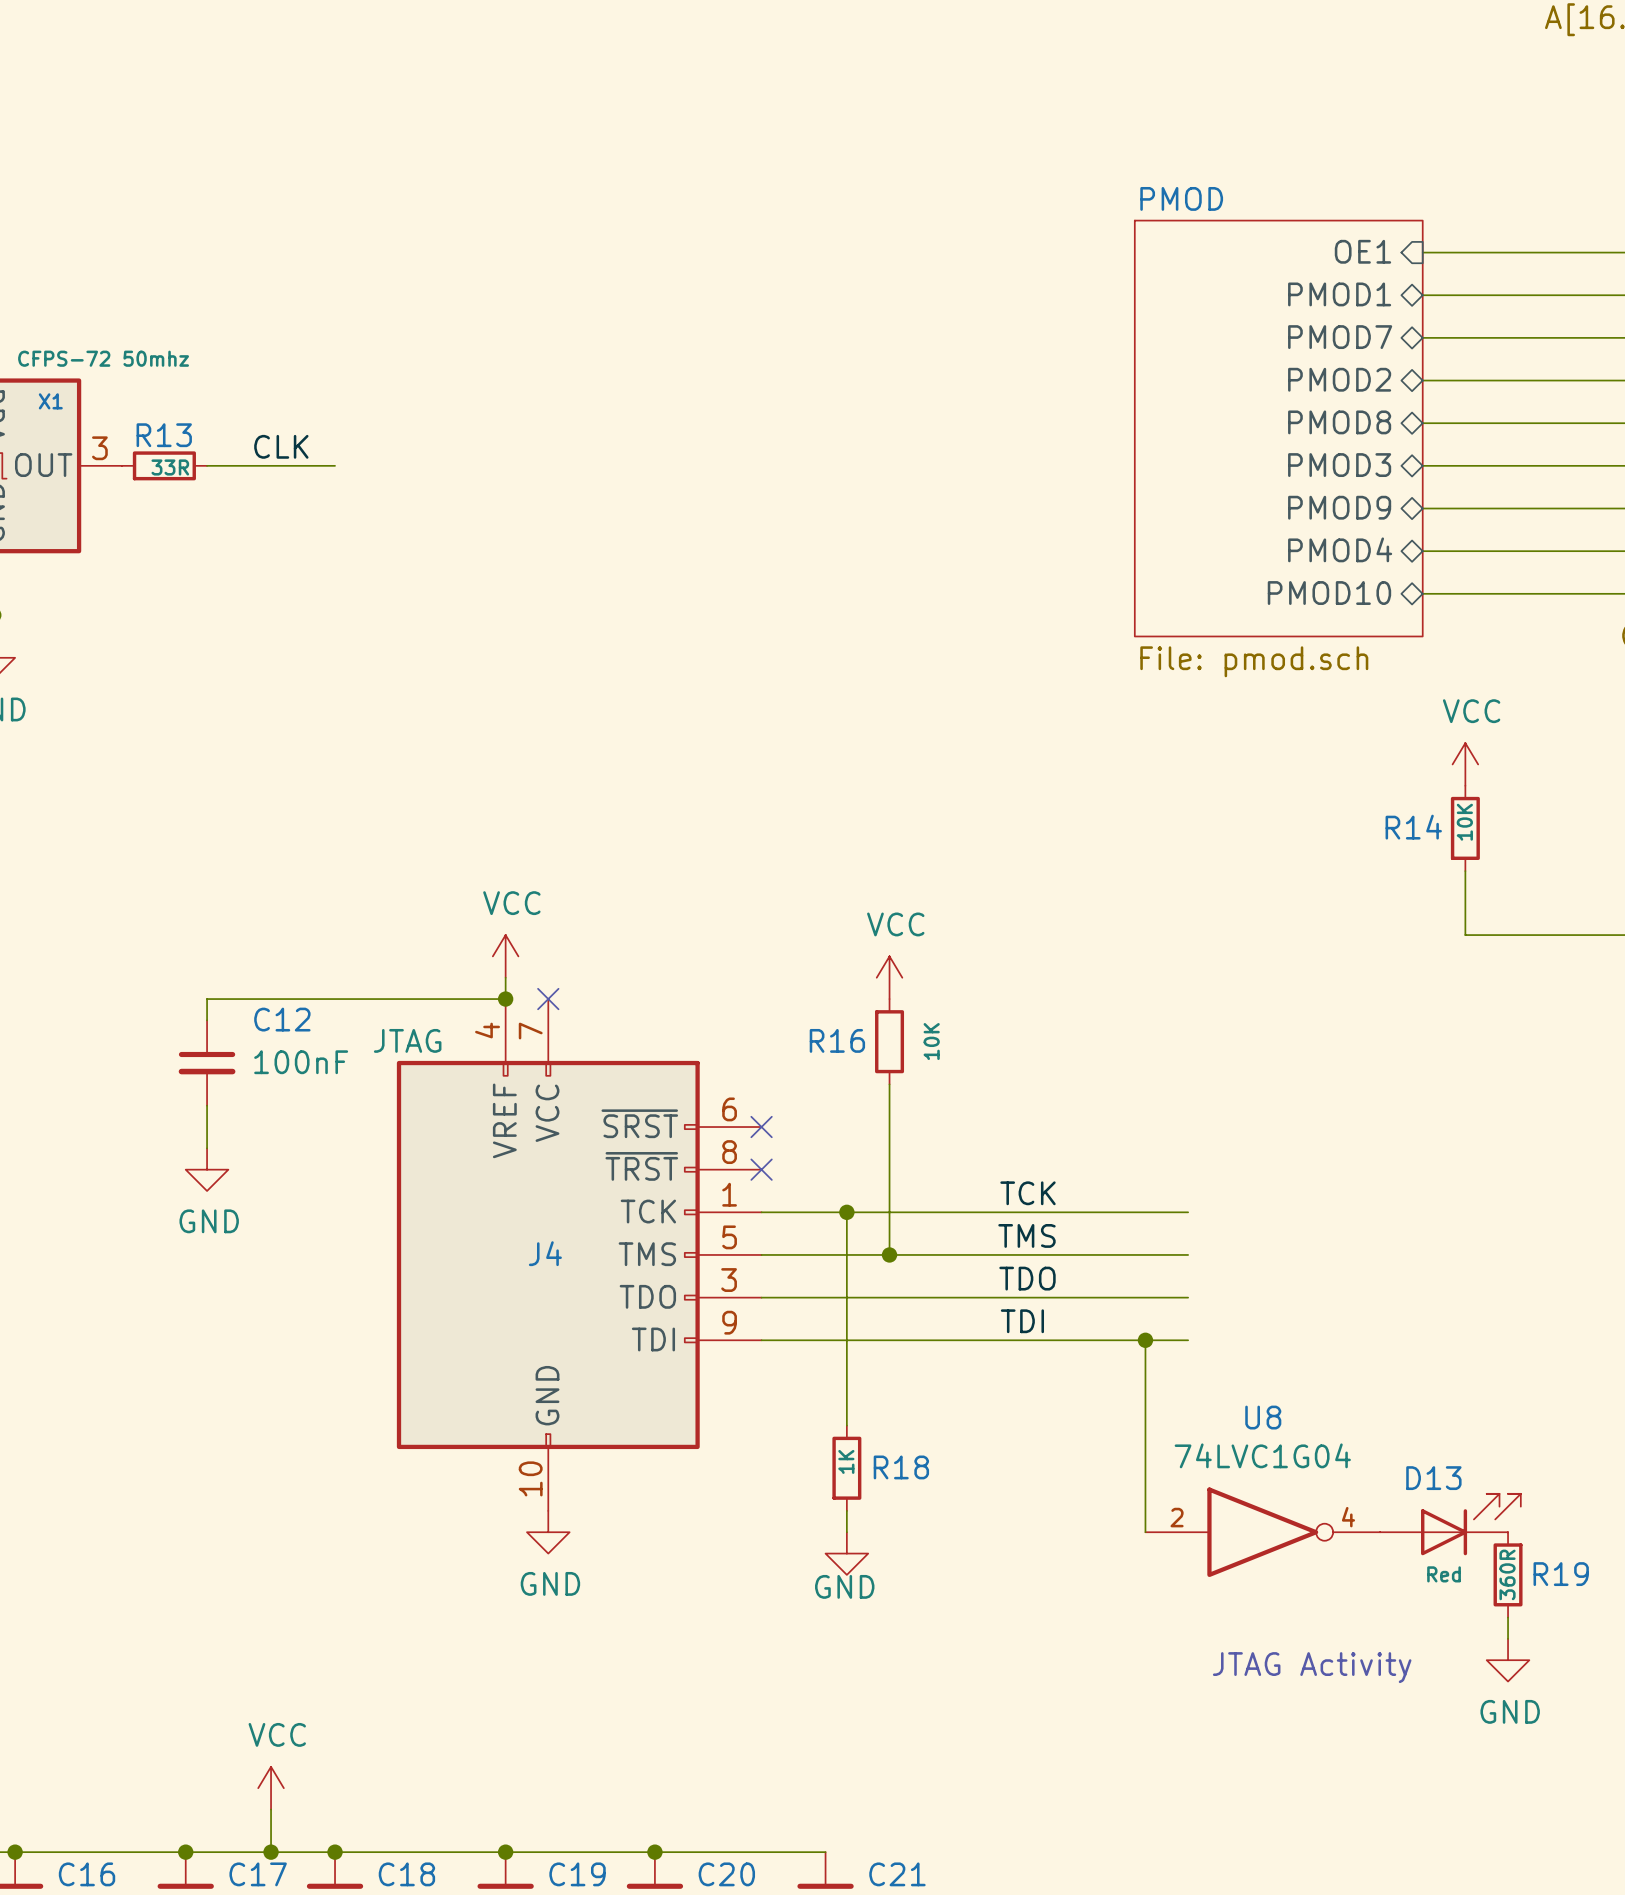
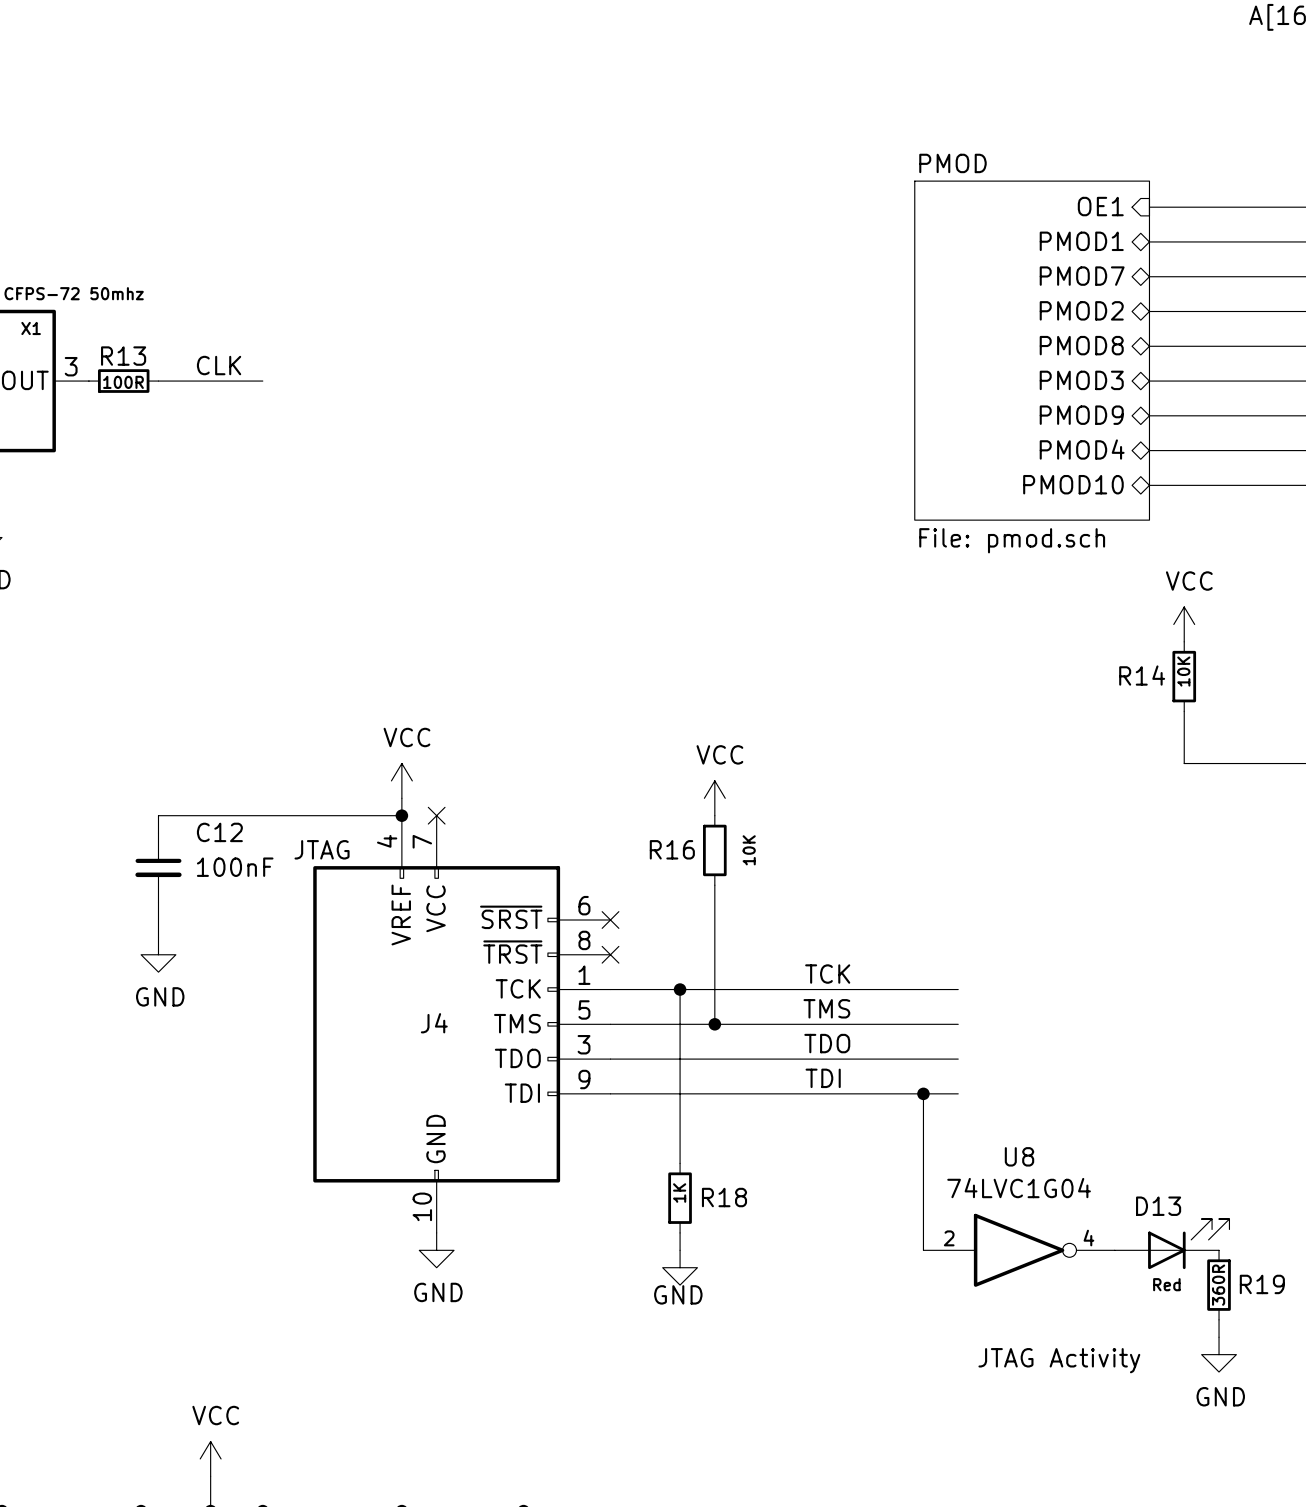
R13 value: 33R (170, 467) -> 100R (123, 382)

